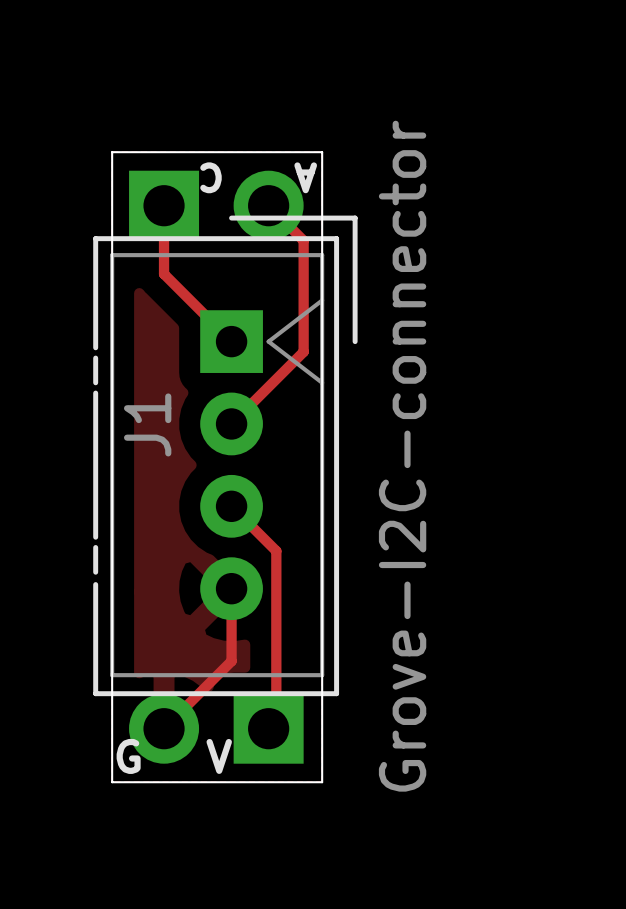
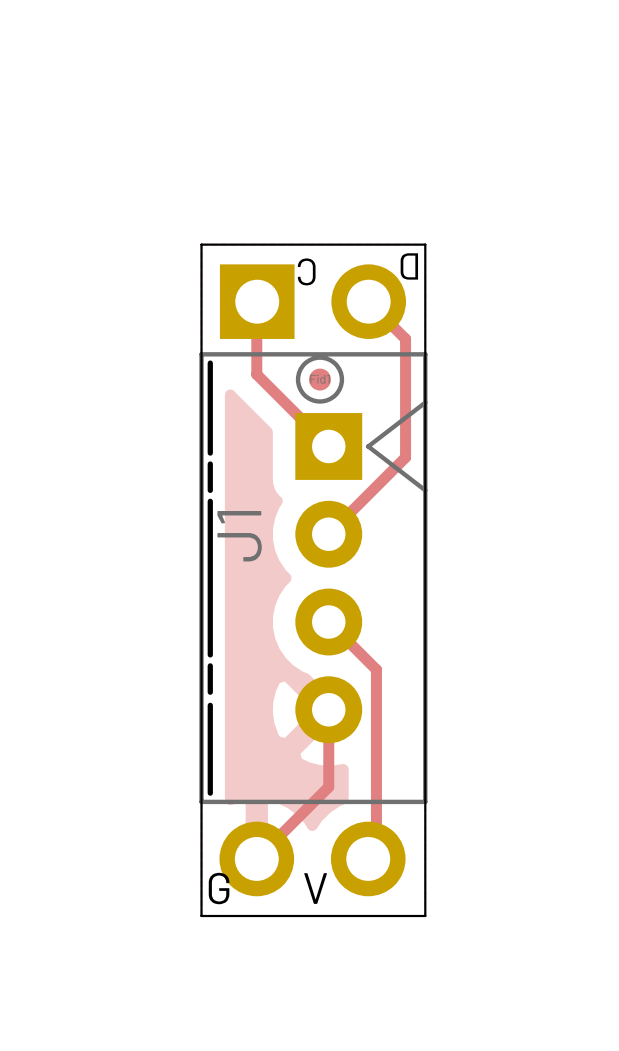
text: A (305, 177) -> D (409, 266)
J1 footprint: [93, 215, 358, 697] -> [199, 352, 428, 805]
part: none -> (319, 379)
J1 value: Grove-I2C-connector (402, 456) -> none
part footprint: [129, 693, 304, 764] -> [219, 821, 406, 897]

